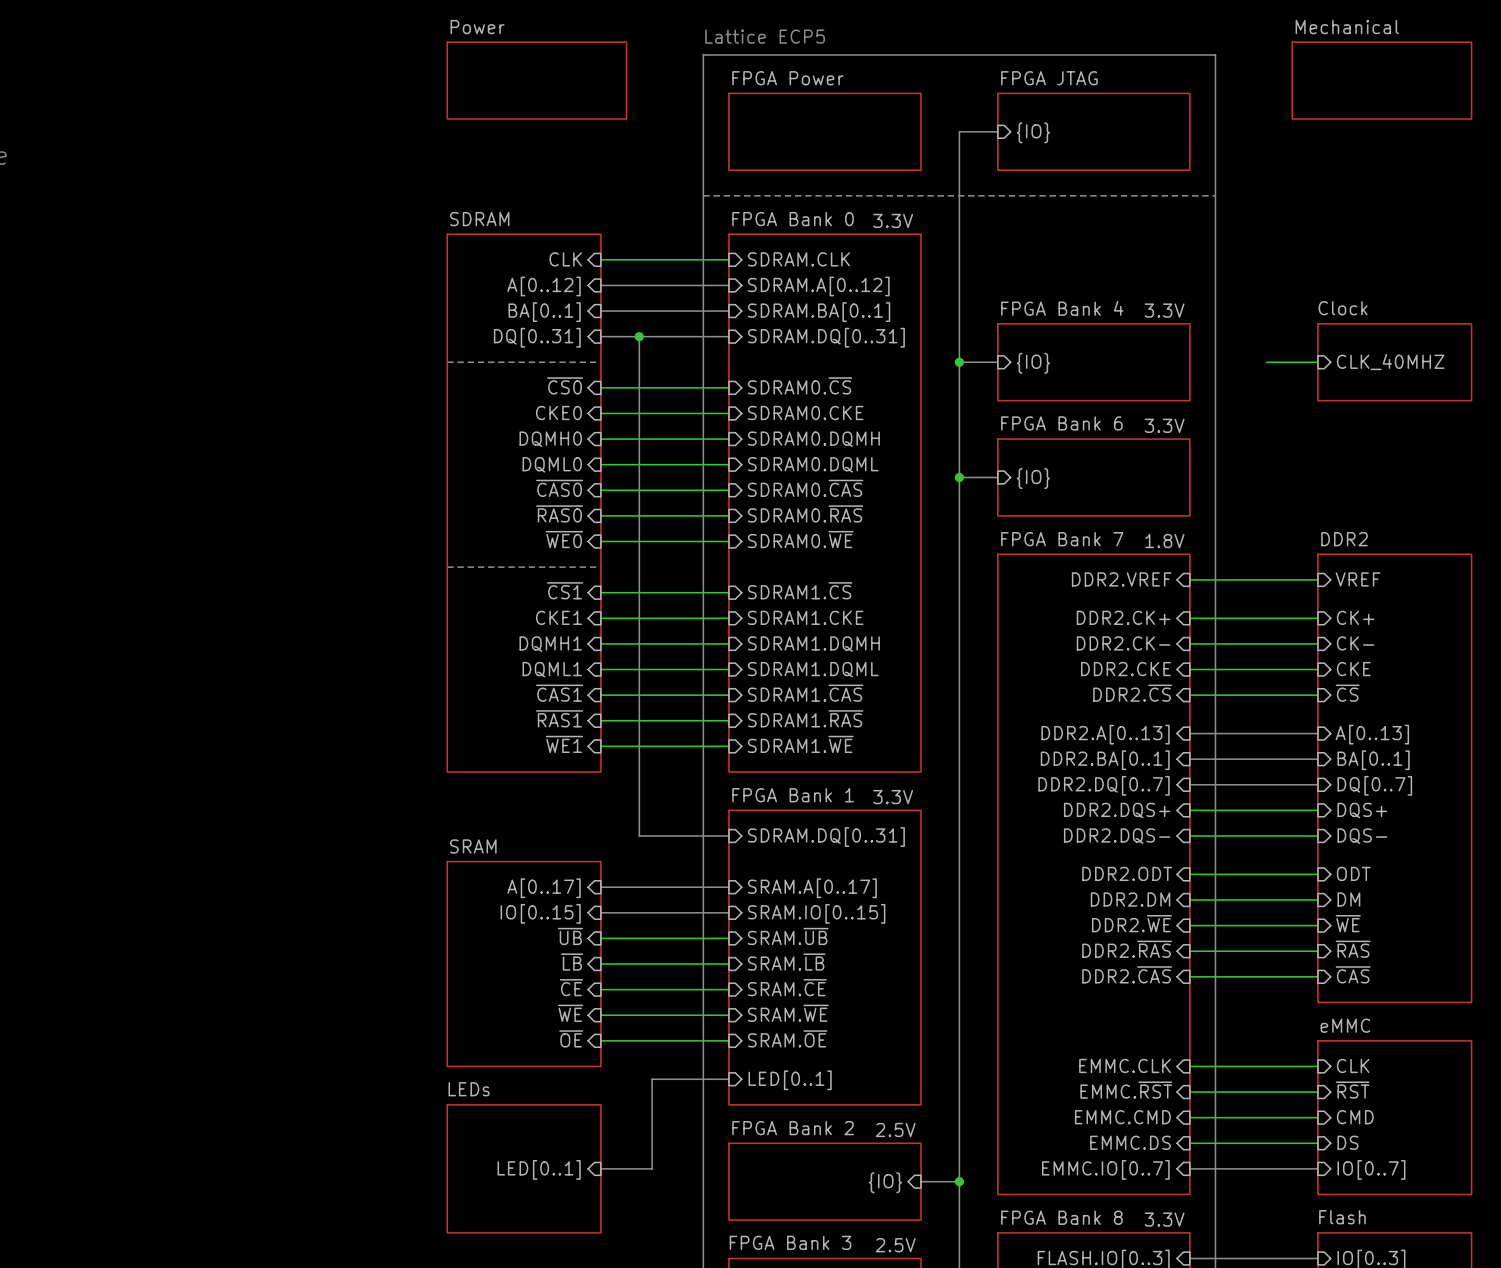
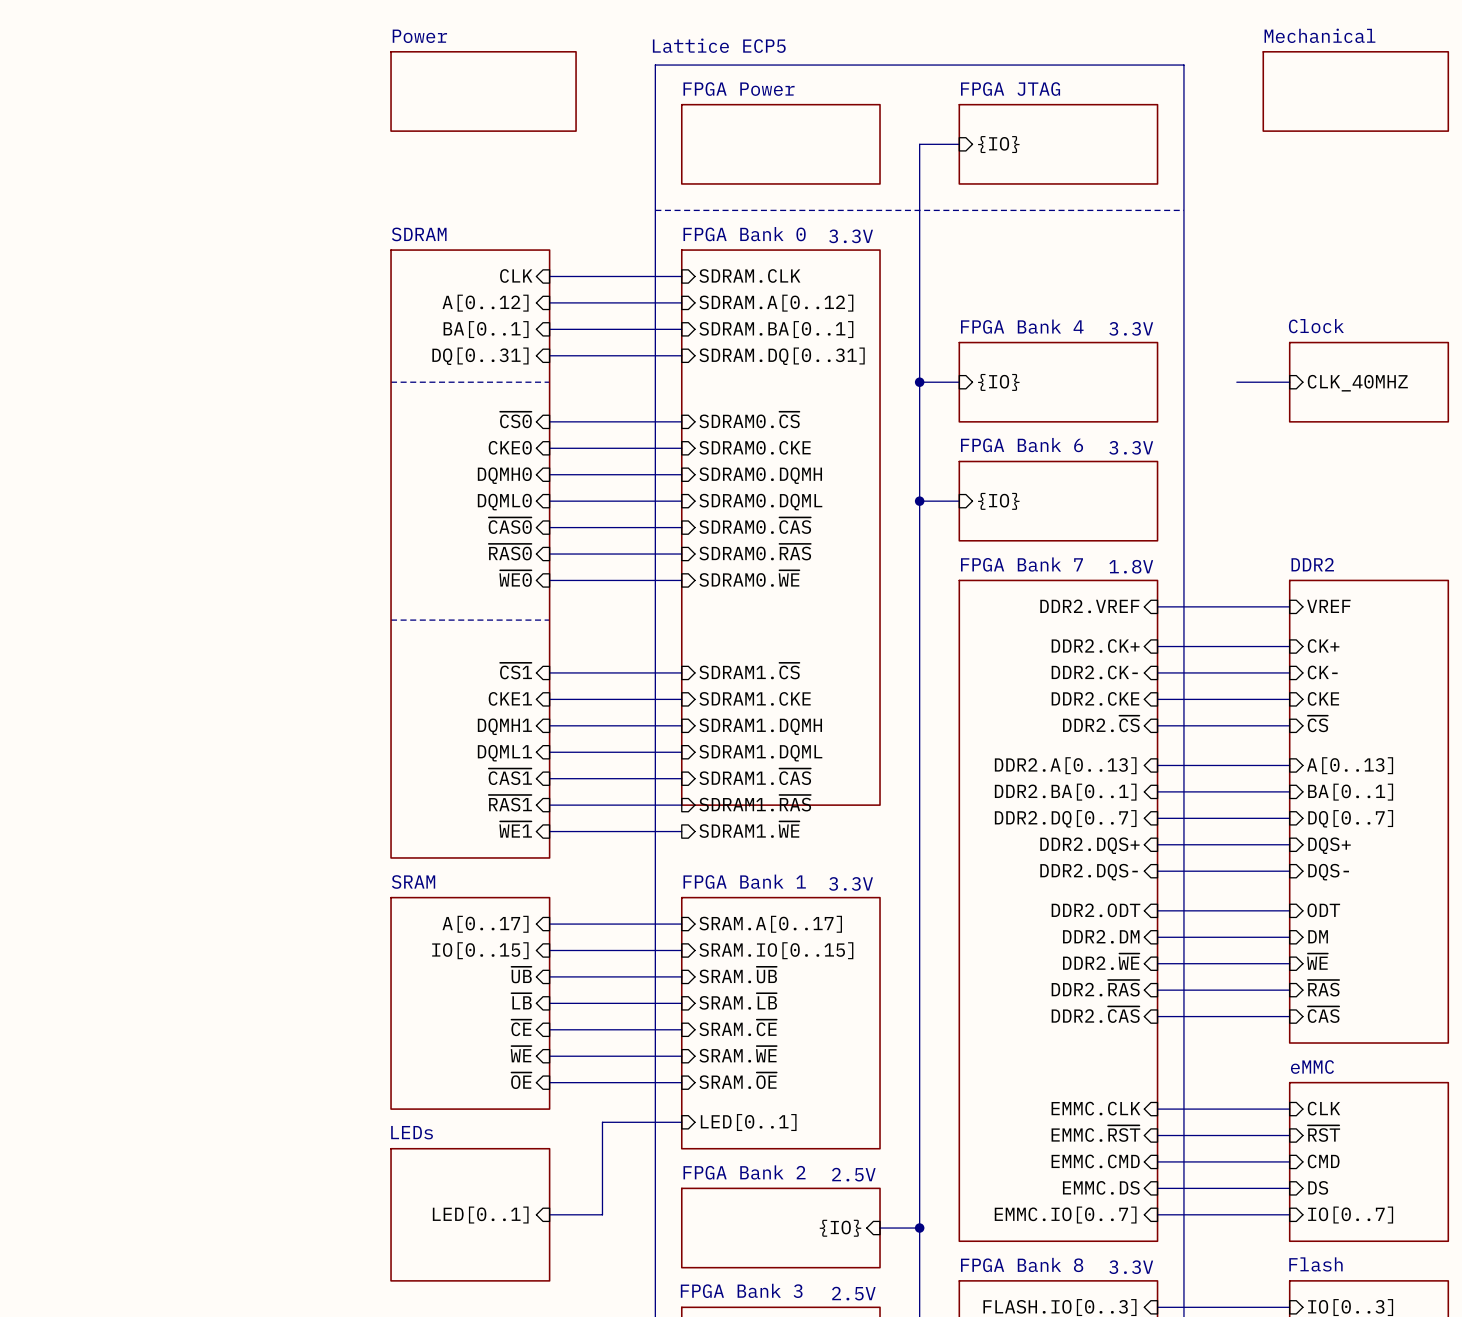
bus: (639, 336) (639, 835) (728, 835) -> none
junction: (639, 336) -> none
sheet pin position: ~{CS0} (565, 385) -> ~{CS0} (515, 419)
sheet pin position: SDRAM0.~{CS} (800, 385) -> SDRAM0.~{CS} (749, 419)
wire: (600, 387) (728, 387) -> (549, 421) (681, 421)
sheet pin position: CKE0 (558, 413) -> CKE0 (510, 447)
wire: (600, 413) (728, 413) -> (549, 448) (681, 448)
sheet pin position: SDRAM0.CKE (805, 413) -> SDRAM0.CKE (755, 447)
sheet pin position: DQMH0 (550, 439) -> DQMH0 (504, 475)
wire: (600, 439) (728, 439) -> (549, 474) (681, 474)
sheet pin position: SDRAM0.DQMH (813, 439) -> SDRAM0.DQMH (760, 475)
sheet pin position: DQML0 (552, 464) -> DQML0 (504, 502)
wire: (600, 464) (728, 464) -> (549, 501) (681, 501)
sheet pin position: SDRAM0.DQML (813, 464) -> SDRAM0.DQML (760, 502)
sheet pin position: ~{CAS0} (559, 488) -> ~{CAS0} (510, 525)
sheet pin position: SDRAM0.~{CAS} (805, 488) -> SDRAM0.~{CAS} (755, 525)
wire: (600, 490) (728, 490) -> (549, 527) (681, 527)
sheet SDRAM: (524, 503) -> none
sheet pin position: ~{RAS0} (559, 513) -> ~{RAS0} (510, 552)
sheet pin position: SDRAM0.~{RAS} (805, 513) -> SDRAM0.~{RAS} (755, 552)
wire: (600, 515) (728, 515) -> (549, 554) (681, 554)
sheet SDRAM: none -> (470, 554)
sheet pin position: ~{WE0} (564, 539) -> ~{WE0} (515, 578)
sheet pin position: SDRAM0.~{WE} (800, 539) -> SDRAM0.~{WE} (749, 578)
wire: (600, 541) (728, 541) -> (549, 580) (681, 580)
line: (447, 567) (600, 567) -> (391, 620) (549, 620)
sheet pin: ~{CS1} (565, 590) -> none
sheet pin: SDRAM1.~{CS} (800, 590) -> none
wire: (600, 592) (728, 592) -> (549, 805) (681, 805)
sheet pin: CKE1 (558, 617) -> none
sheet pin: SDRAM1.CKE (805, 617) -> none
wire: (600, 618) (728, 618) -> (549, 831) (681, 831)
sheet pin: DQMH1 (550, 644) -> ~{CS1} (516, 671)
sheet pin: SDRAM1.DQMH (813, 644) -> SDRAM1.~{CS} (749, 671)
sheet pin: DQML1 (552, 669) -> CKE1 (510, 698)
sheet pin: SDRAM1.DQML (813, 669) -> SDRAM1.CKE (755, 698)
sheet pin: ~{CAS1} (559, 693) -> DQMH1 (504, 726)
sheet pin: SDRAM1.~{CAS} (805, 693) -> SDRAM1.DQMH (760, 726)
sheet pin: ~{RAS1} (559, 718) -> DQML1 (504, 753)
sheet pin: SDRAM1.~{RAS} (805, 718) -> SDRAM1.DQML (760, 753)
sheet pin: ~{WE1} (564, 744) -> ~{CAS1} (510, 776)
sheet pin: SDRAM1.~{WE} (800, 744) -> SDRAM1.~{CAS} (755, 776)
sheet pin: none -> ~{RAS1} (510, 803)
sheet pin: none -> SDRAM1.~{RAS} (755, 803)
sheet pin: none -> ~{WE1} (515, 829)
sheet FPGA Bank 1 name position: FPGA Bank 1 (793, 795) -> FPGA Bank 1 (744, 881)
sheet pin: none -> SDRAM1.~{WE} (749, 829)
sheet FPGA Bank 1 text position: 3.3V (893, 797) -> 3.3V (851, 883)
sheet FPGA Bank 1 shape: [728, 809, 922, 1106] -> [680, 896, 881, 1150]
sheet pin: SDRAM.DQ[0..31] (826, 837) -> none

